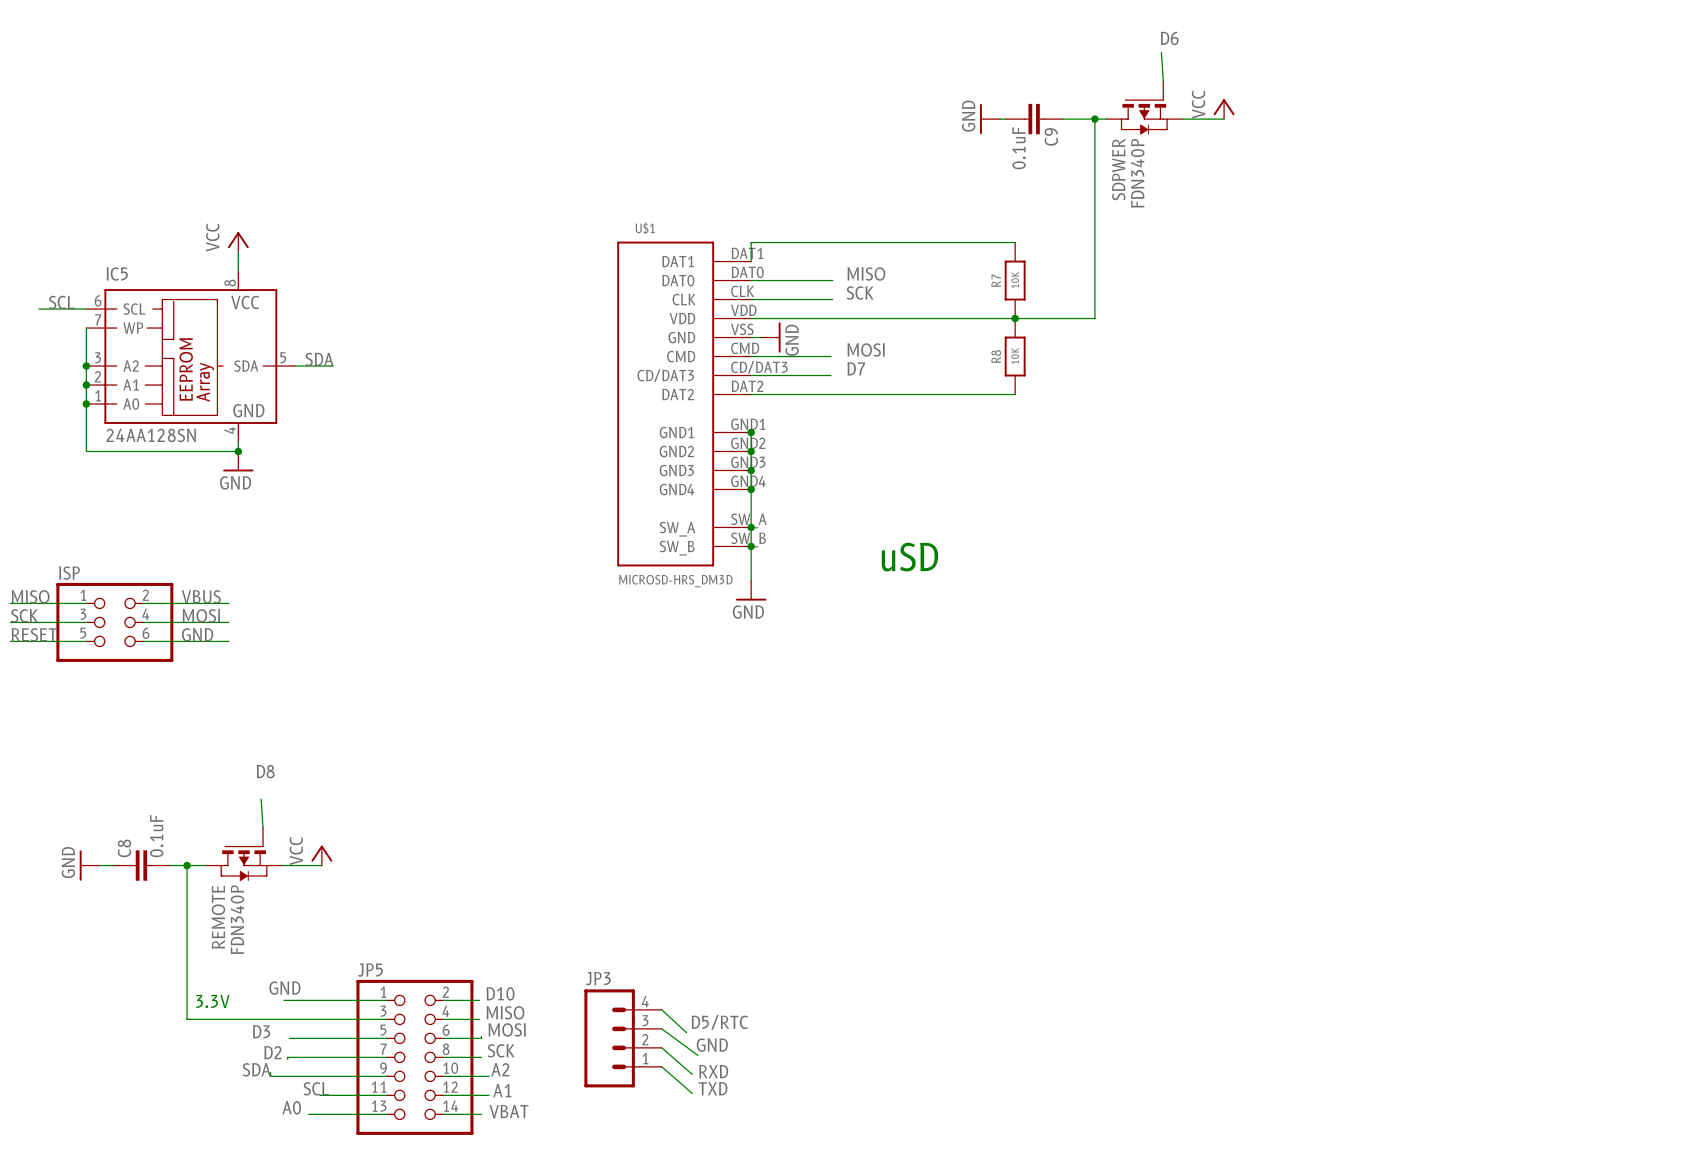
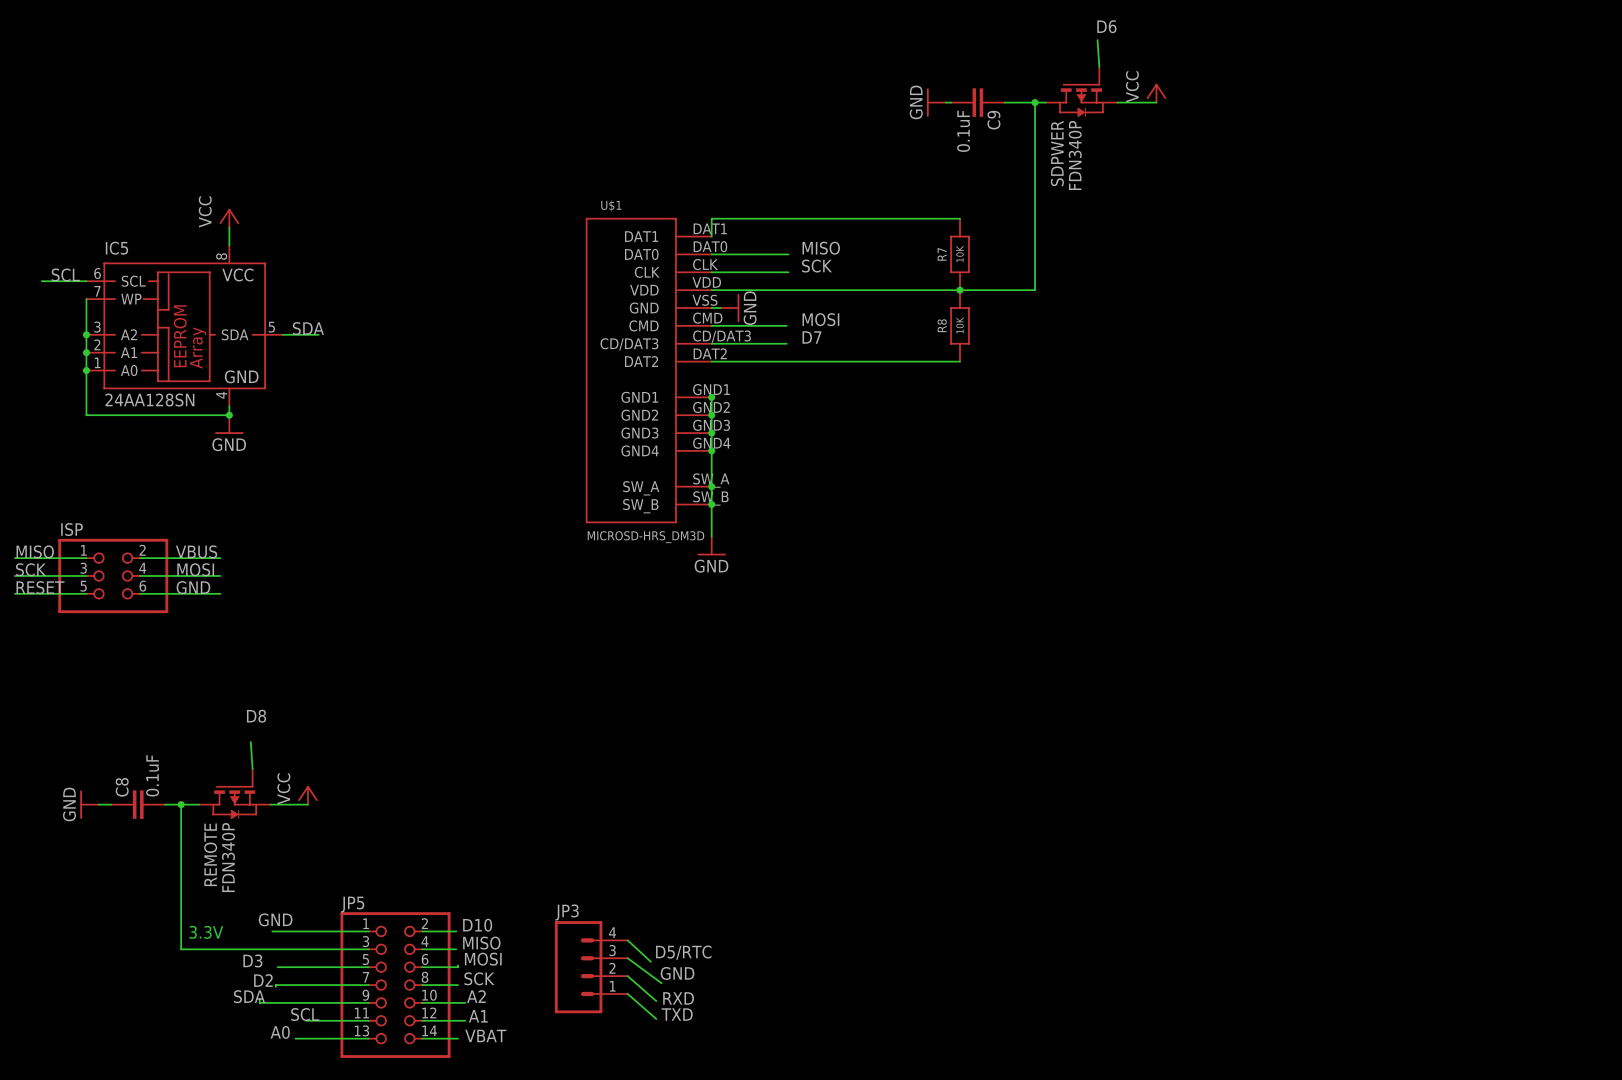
text: uSD (909, 557) -> none

